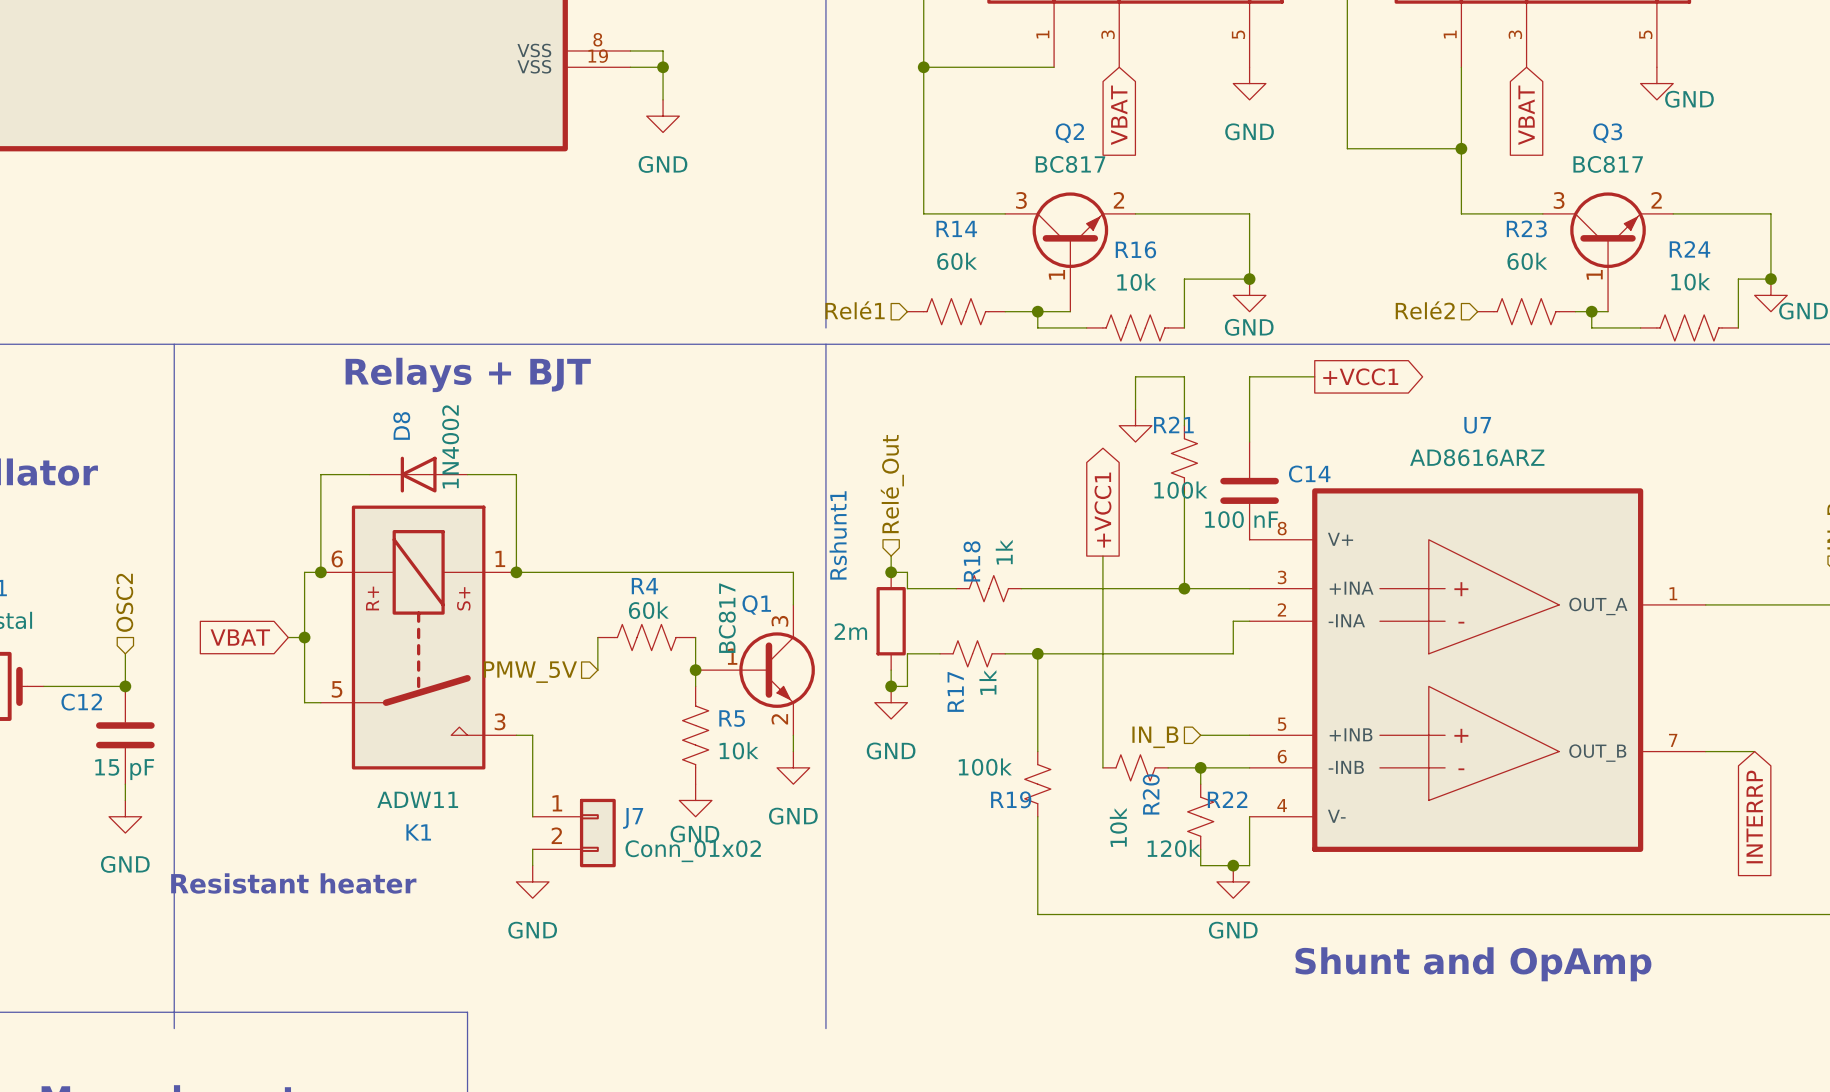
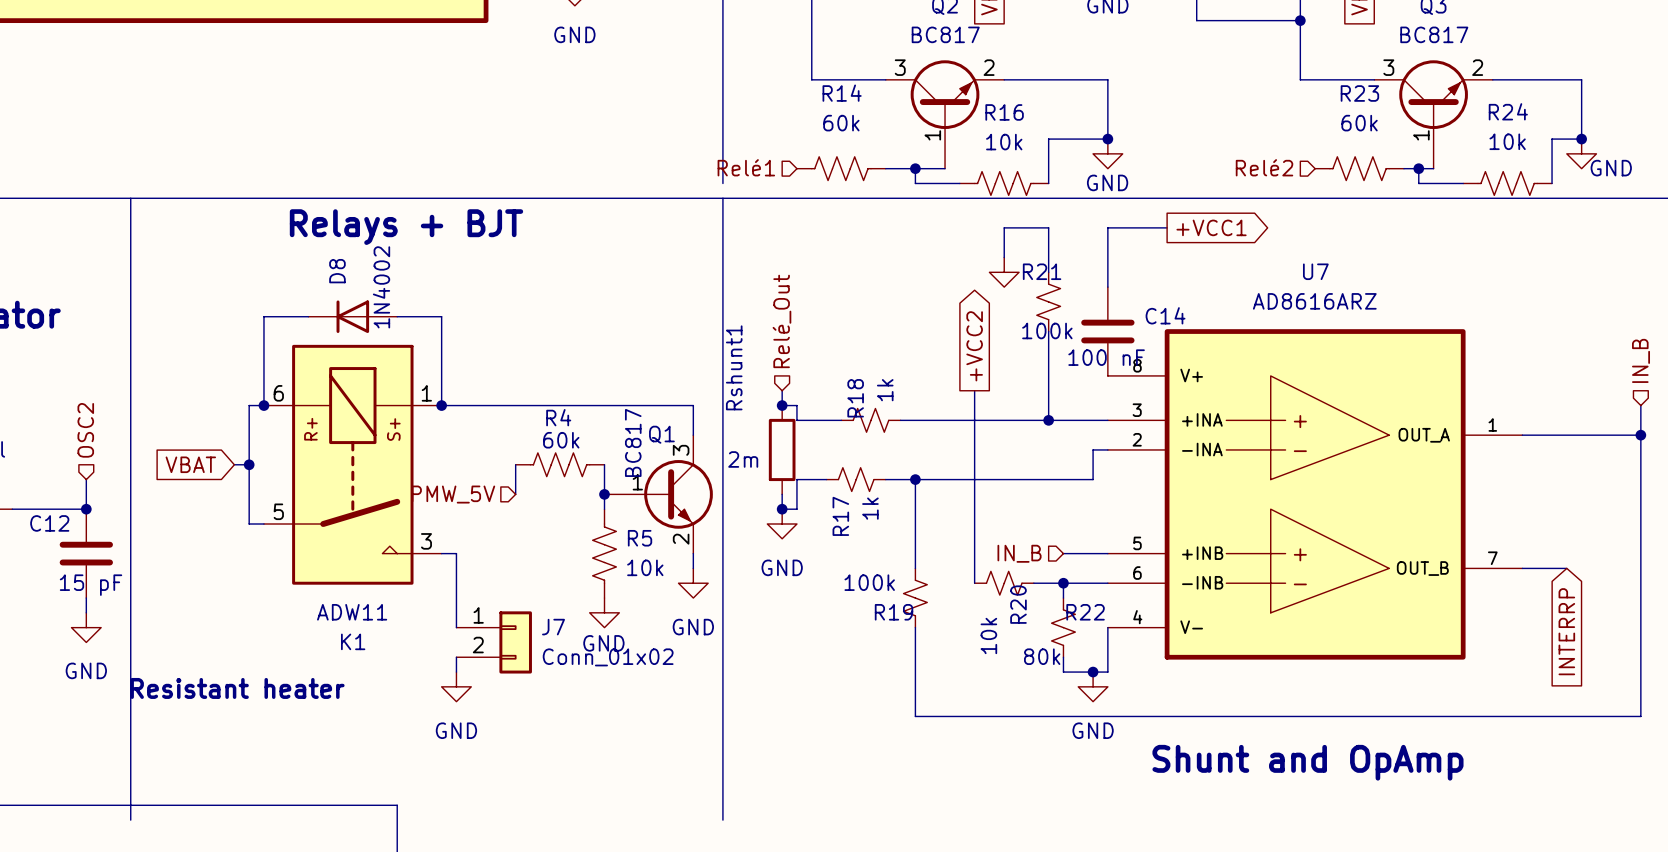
global label: +VCC1 (1102, 510) -> +VCC2 (974, 346)
R22 value: 120k (1174, 848) -> 80k (1042, 656)

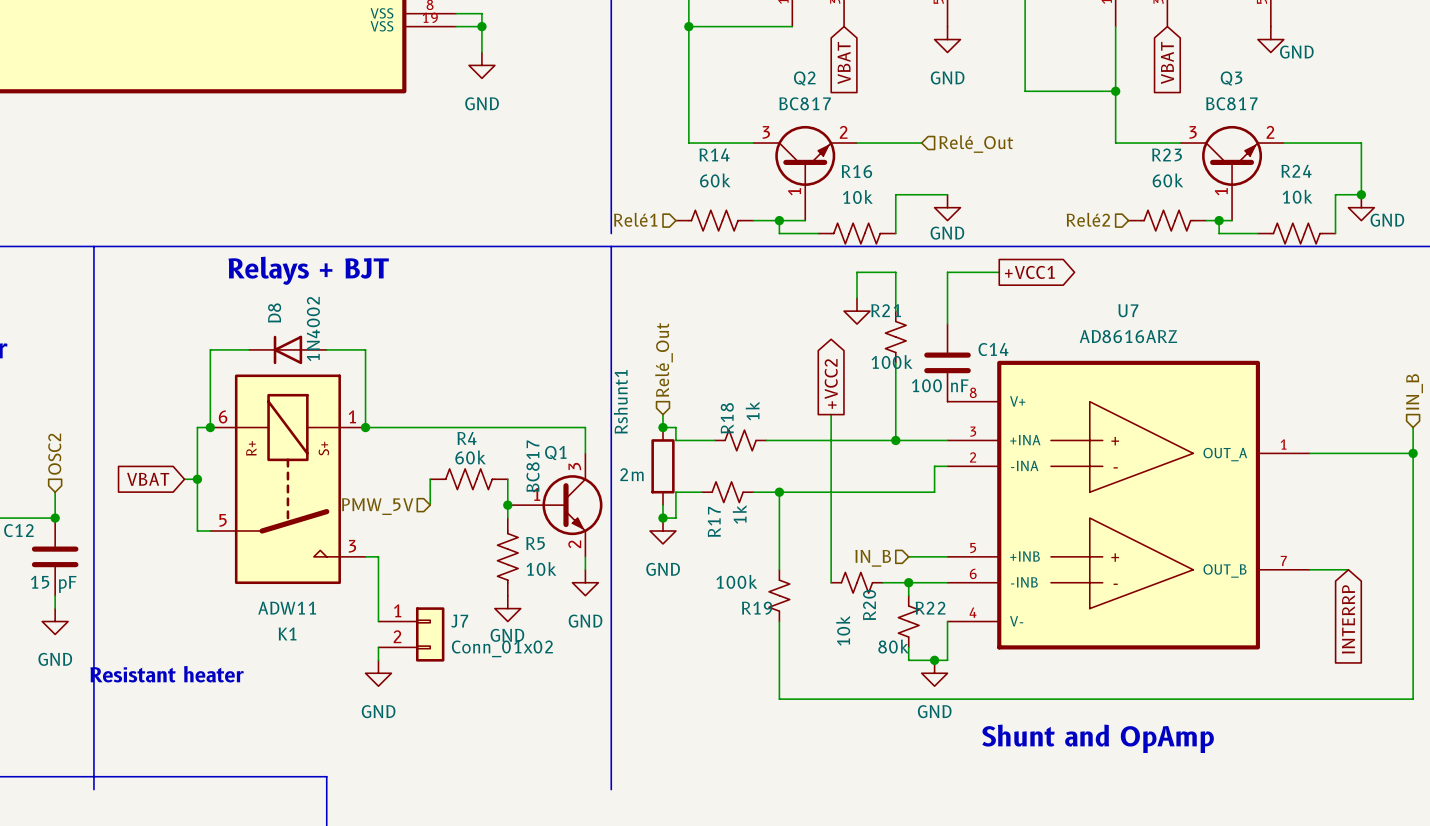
wire: (1078, 79) (1107, 79) (1107, 139) -> none
hierarchical label: none -> Relé_Out (976, 144)
junction: (1107, 139) -> none

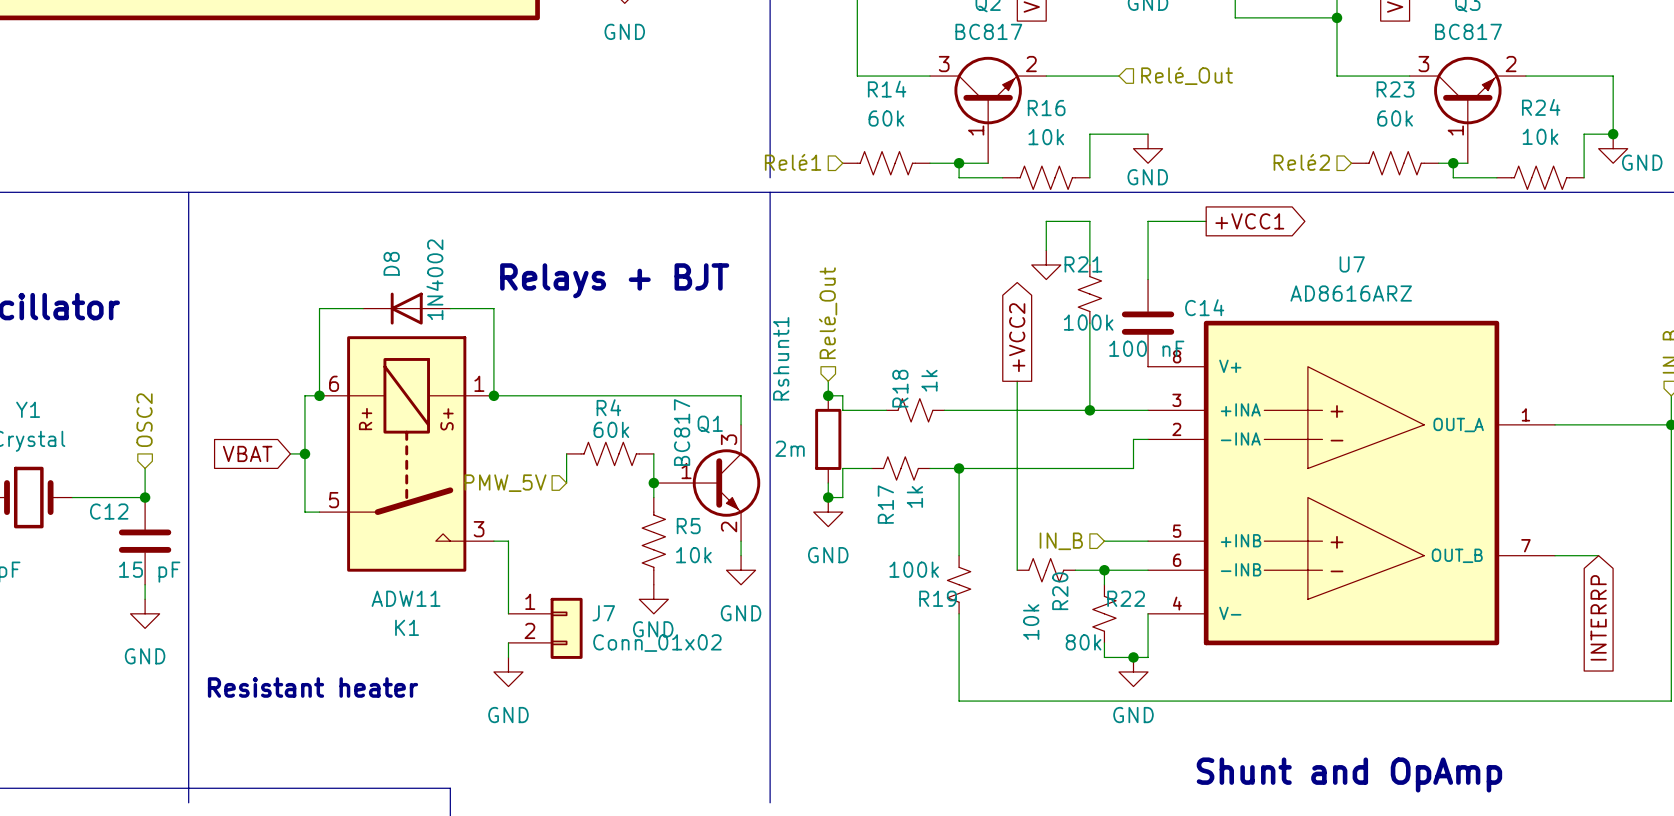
text position: Relays + BJT (308, 270) -> Relays + BJT (614, 280)
text position: Resistant heater (167, 674) -> Resistant heater (312, 687)
text position: Shunt and OpAmp (1098, 738) -> Shunt and OpAmp (1349, 774)

